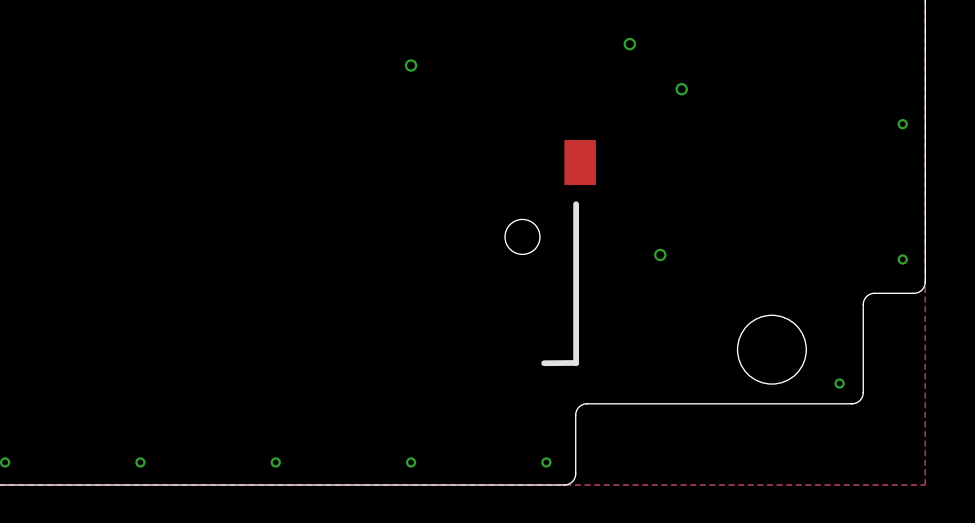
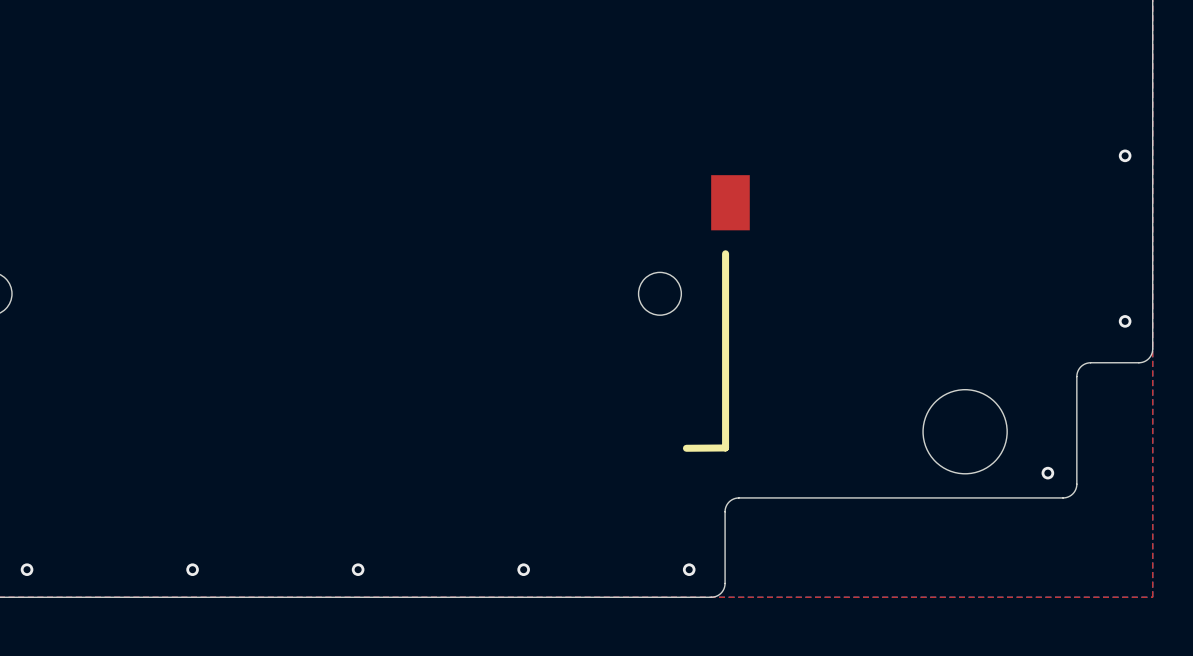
via: (629, 44) -> none
via: (411, 65) -> none
via: (681, 89) -> none
via: (660, 254) -> none

